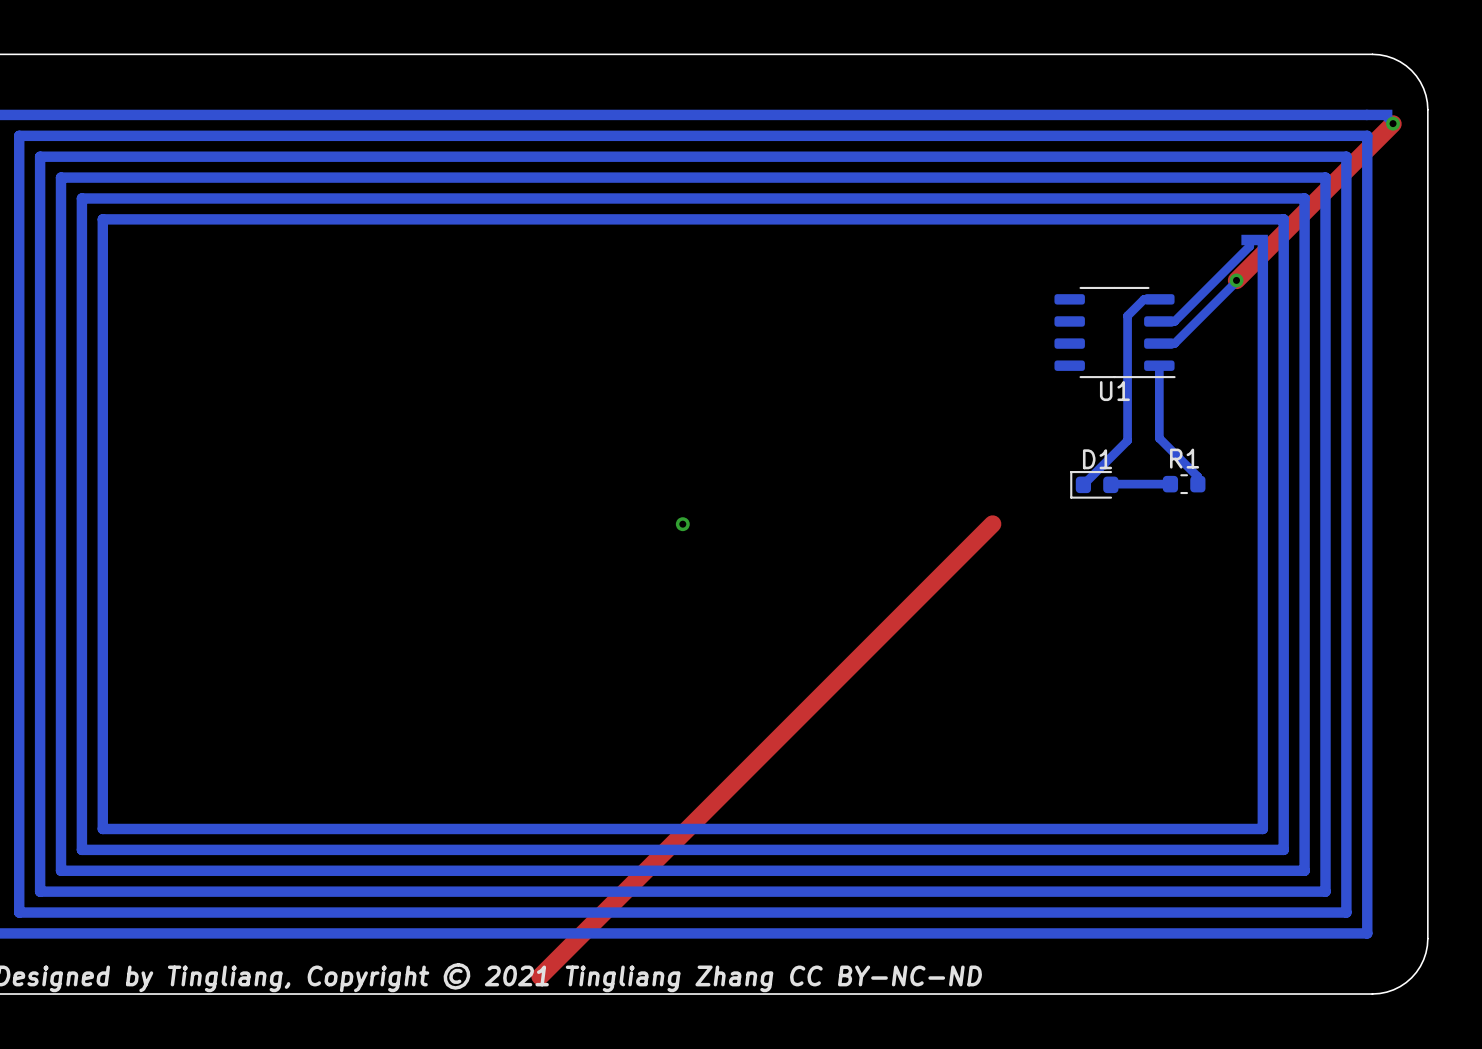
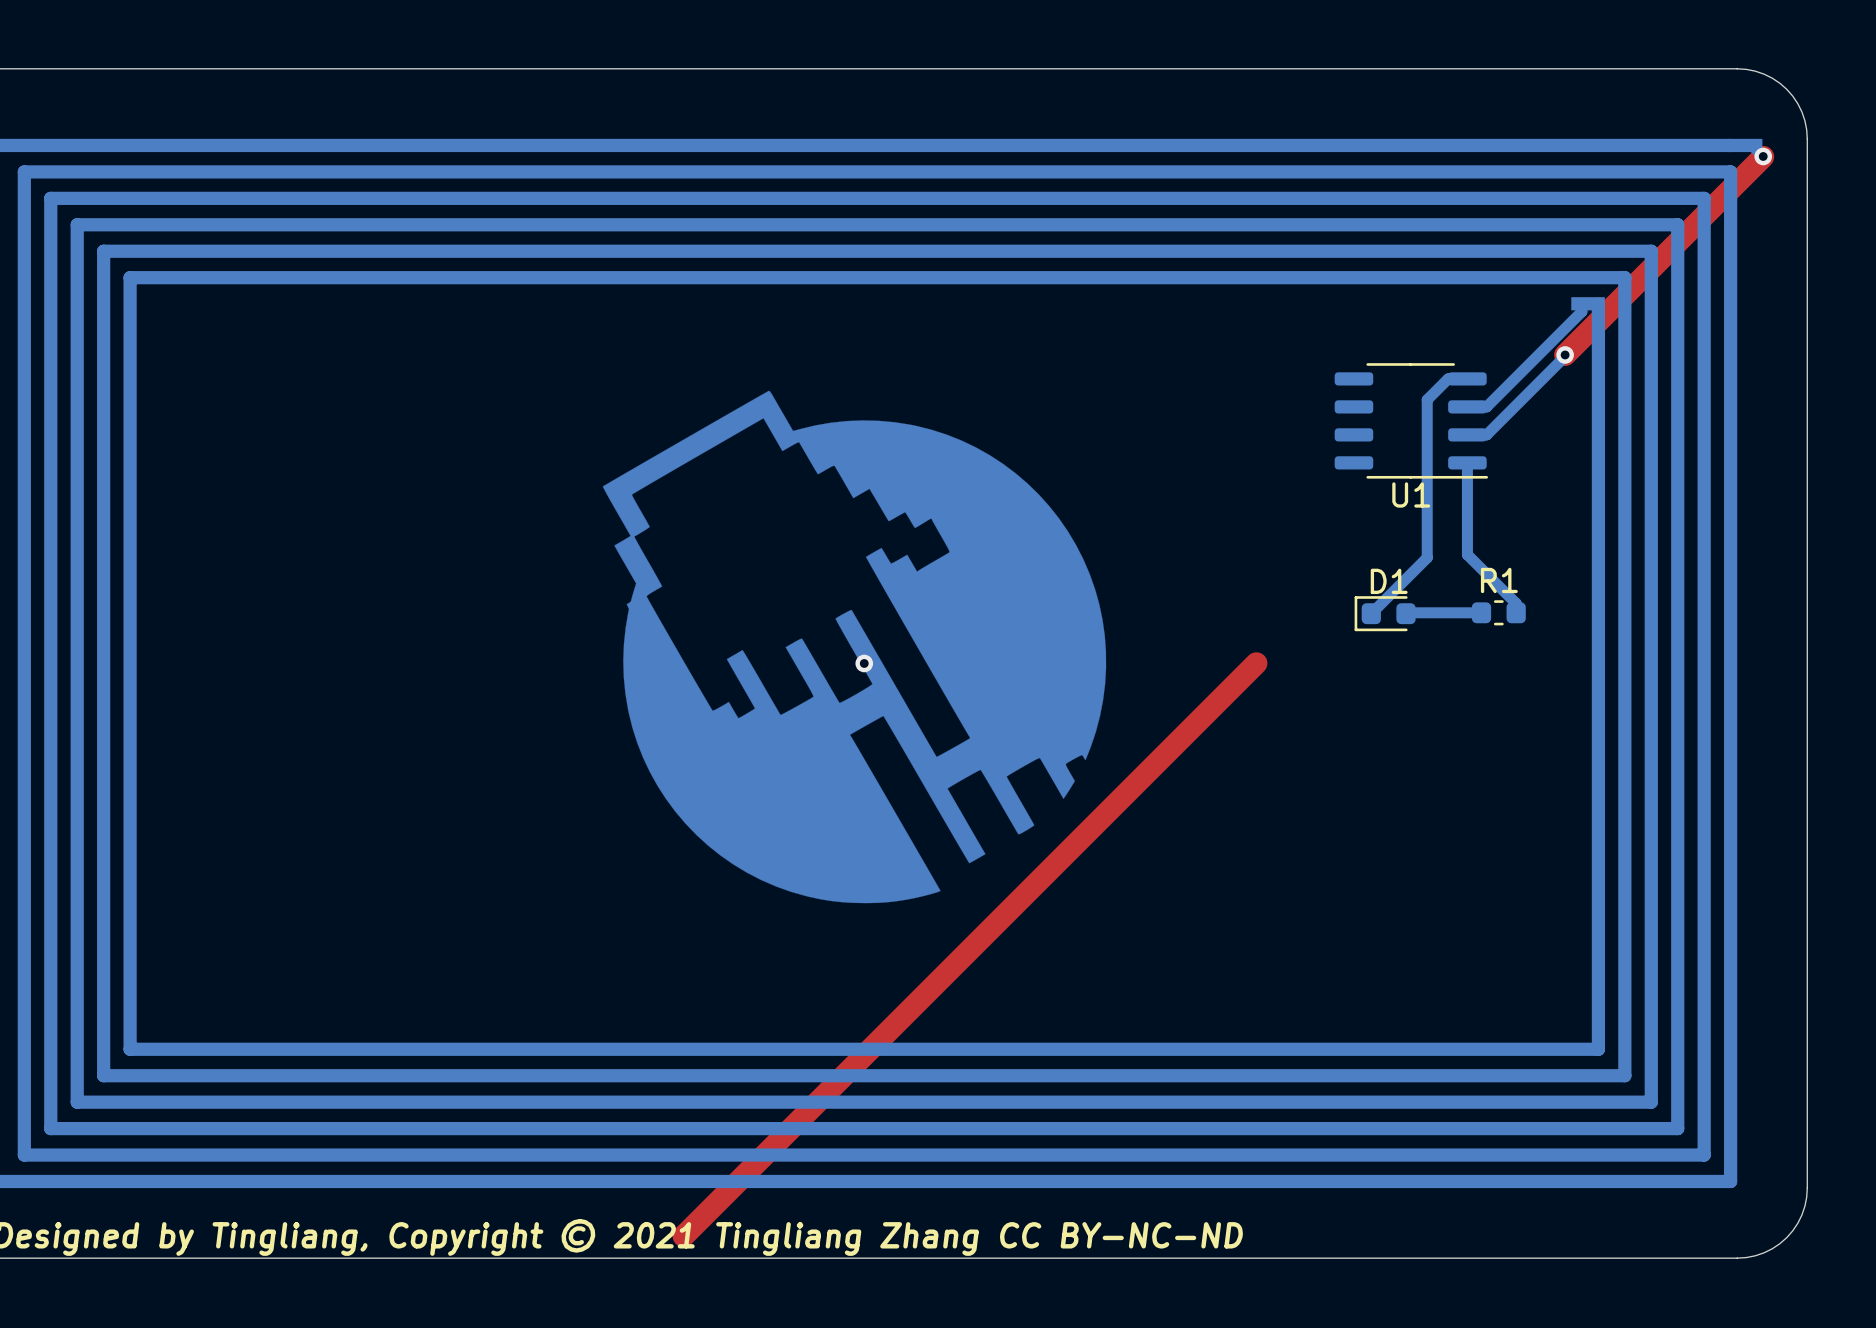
drawing: none -> [602, 390, 1107, 904]

